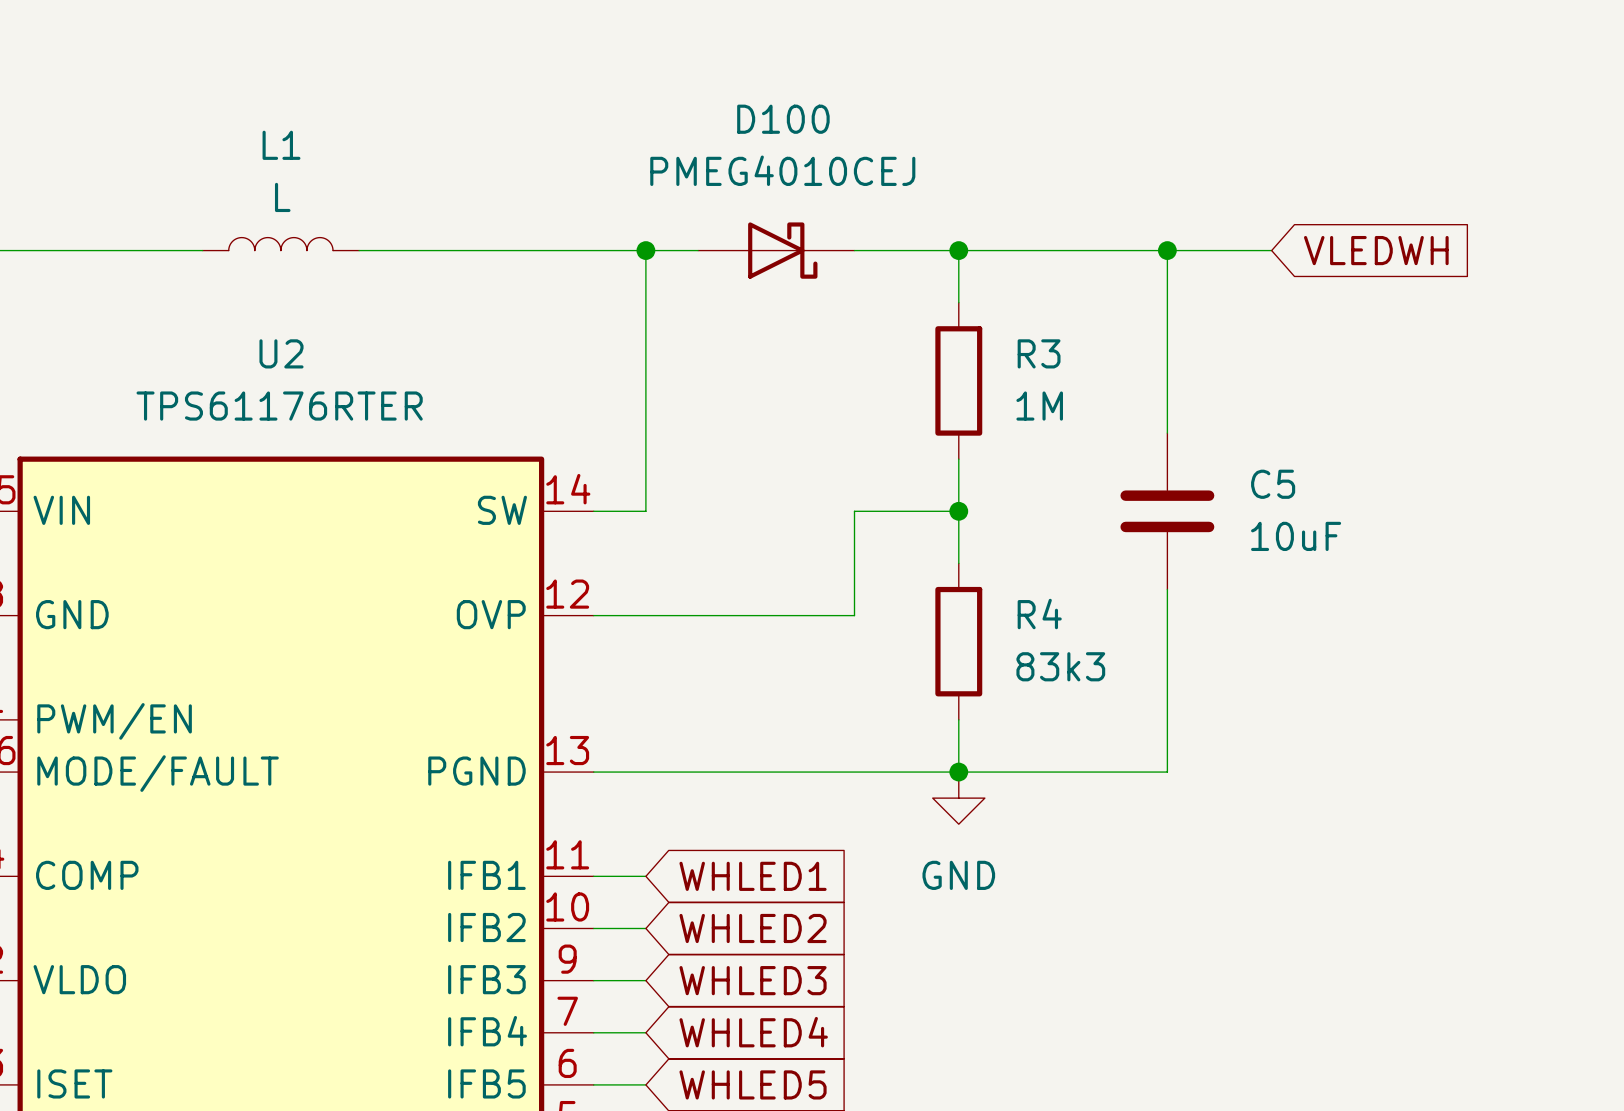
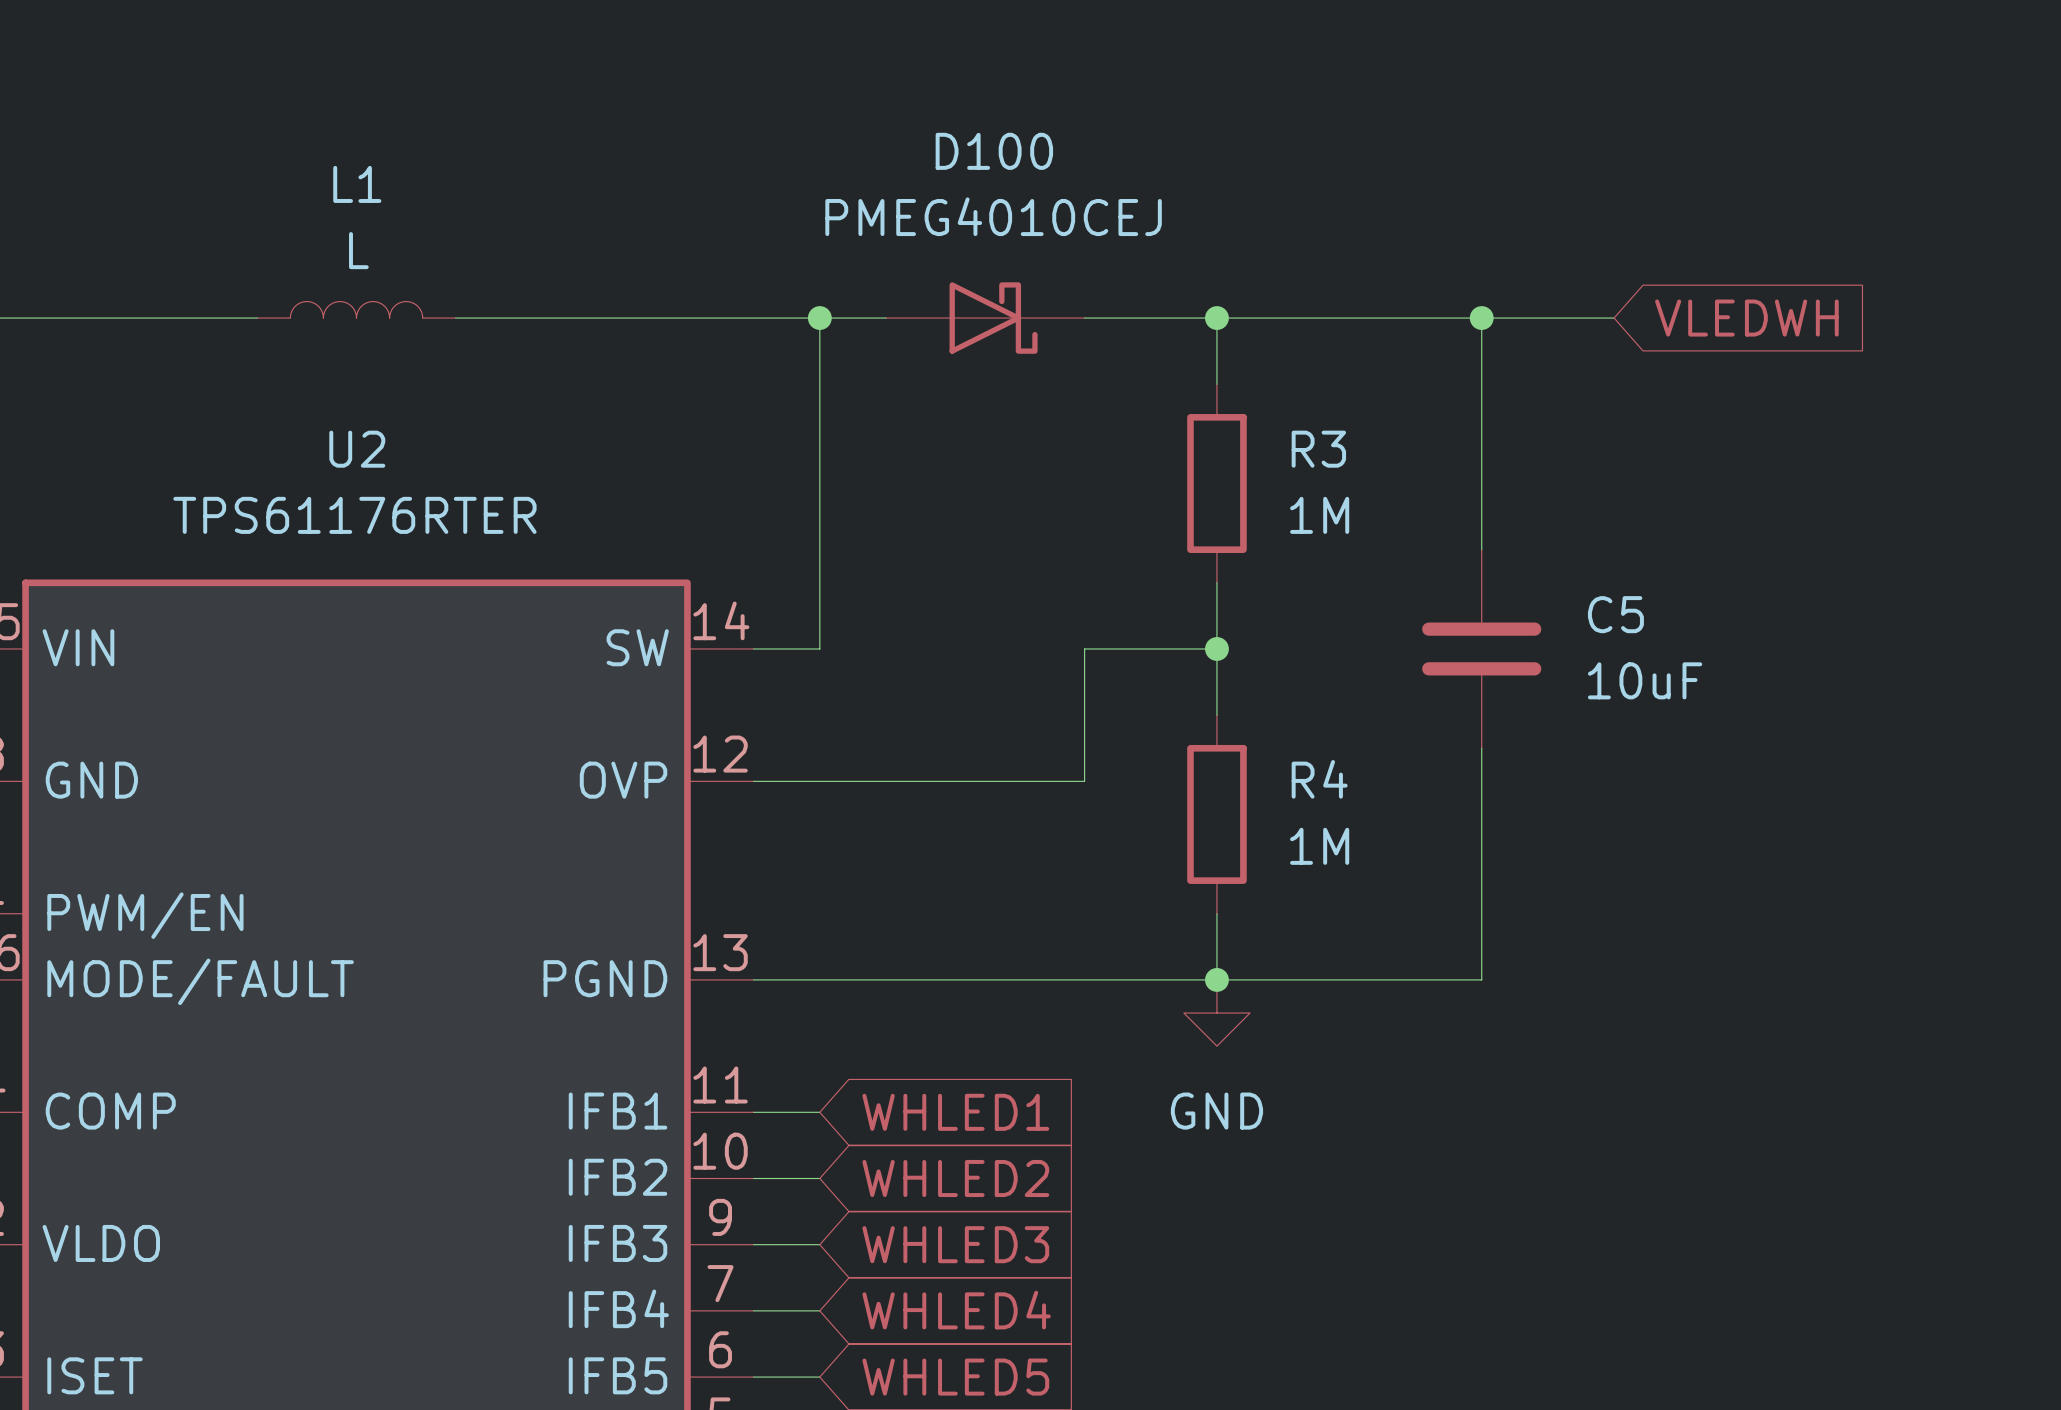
R4 value: 83k3 (1060, 666) -> 1M (1319, 846)

